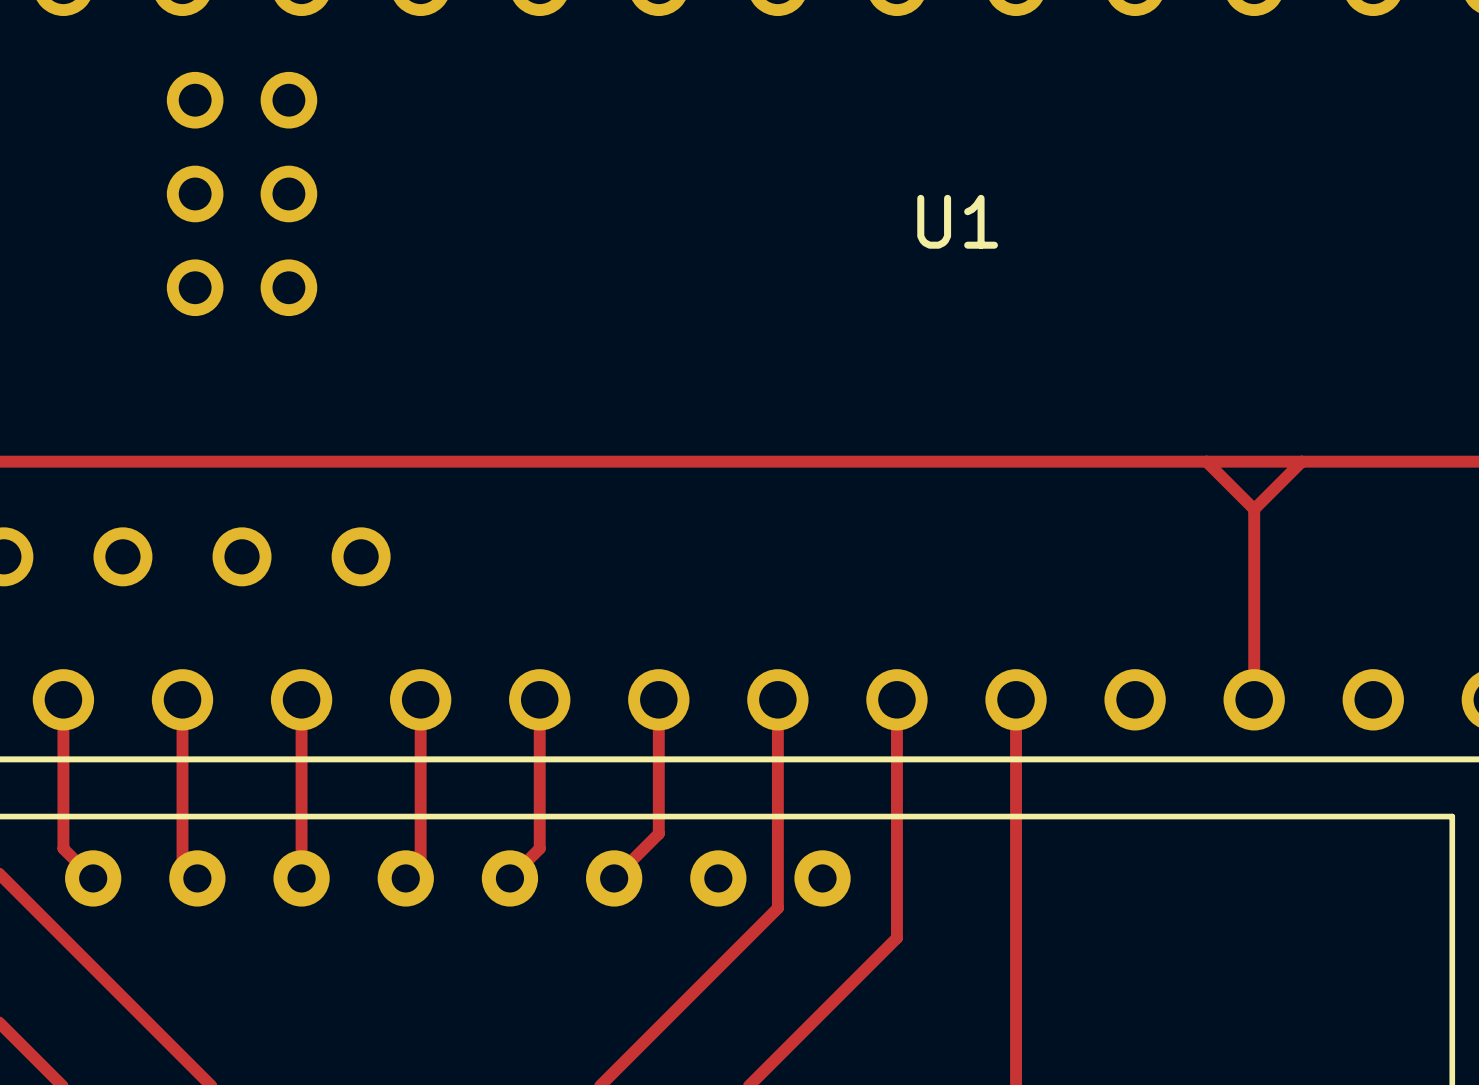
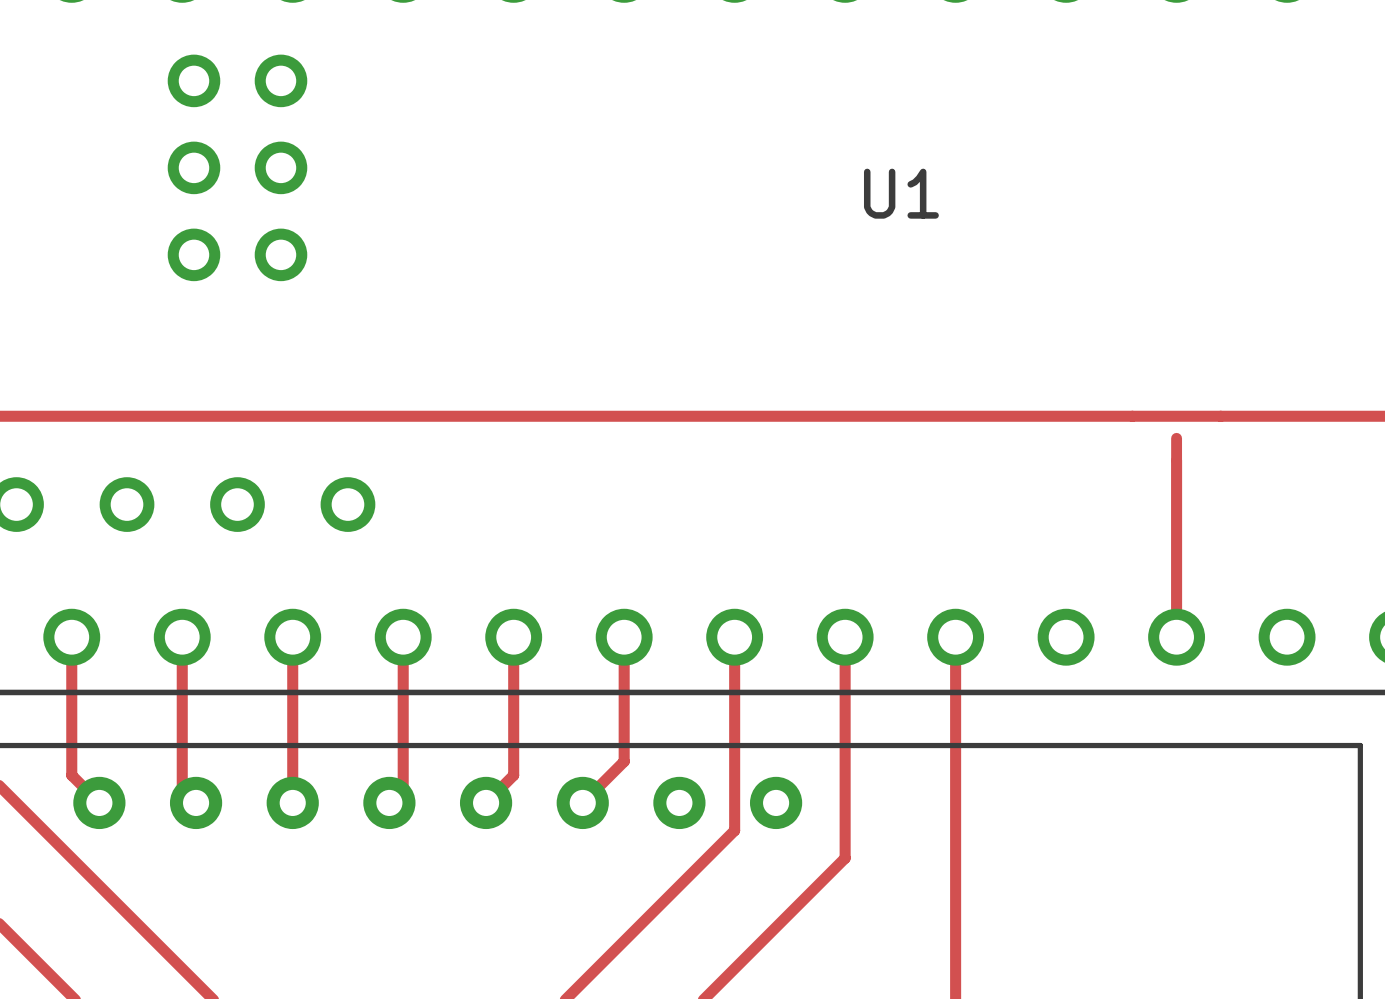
top track: (1206, 461) (1254, 509) (1301, 461) -> none
top track: none -> (1176, 438) (1176, 460)

